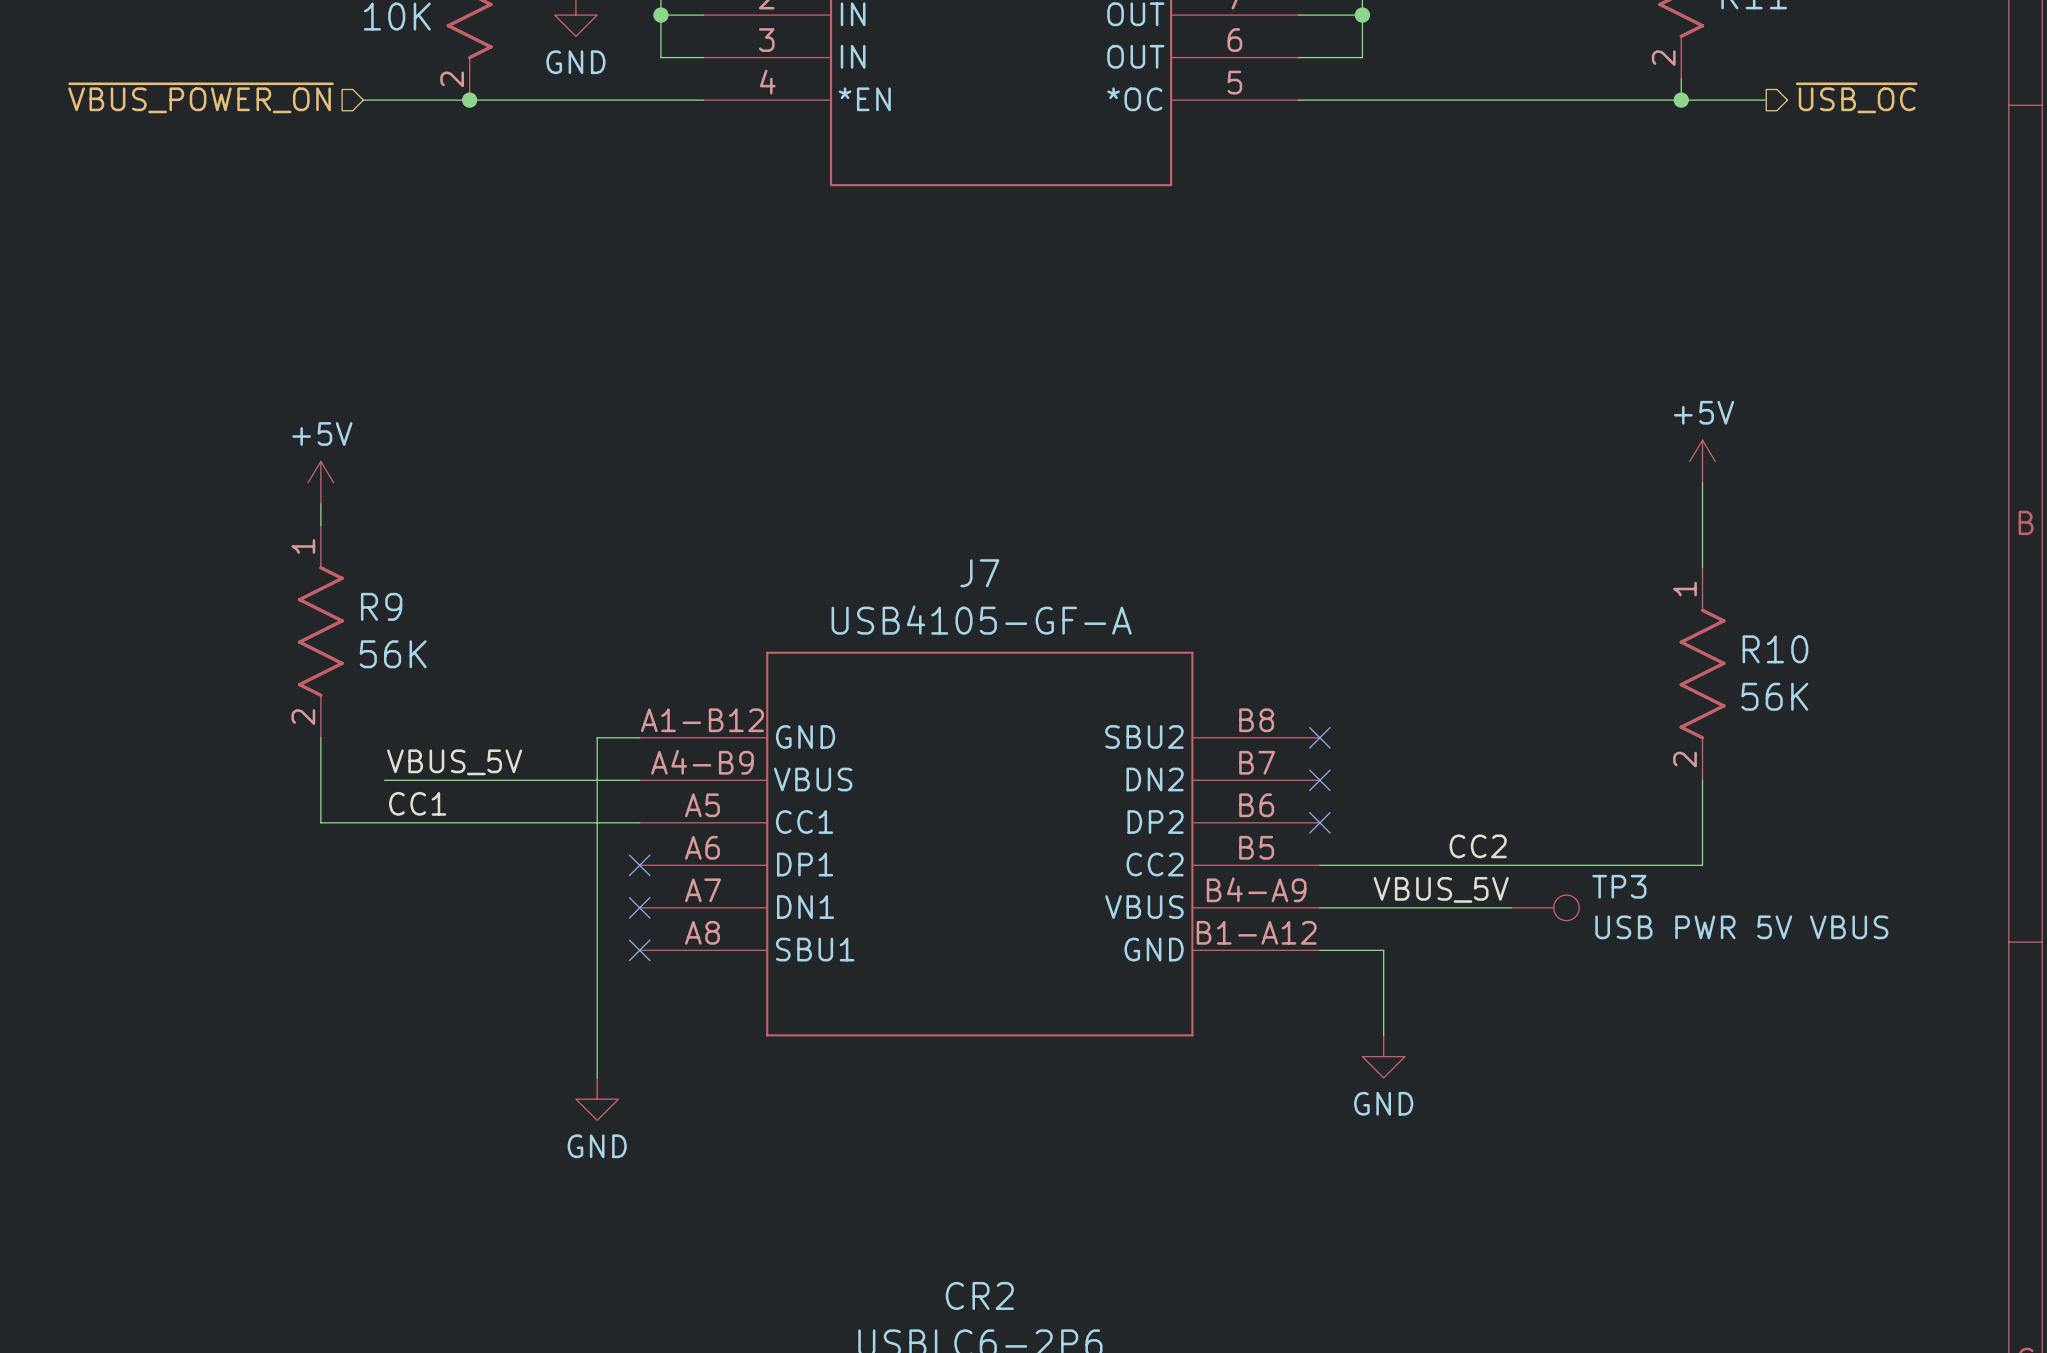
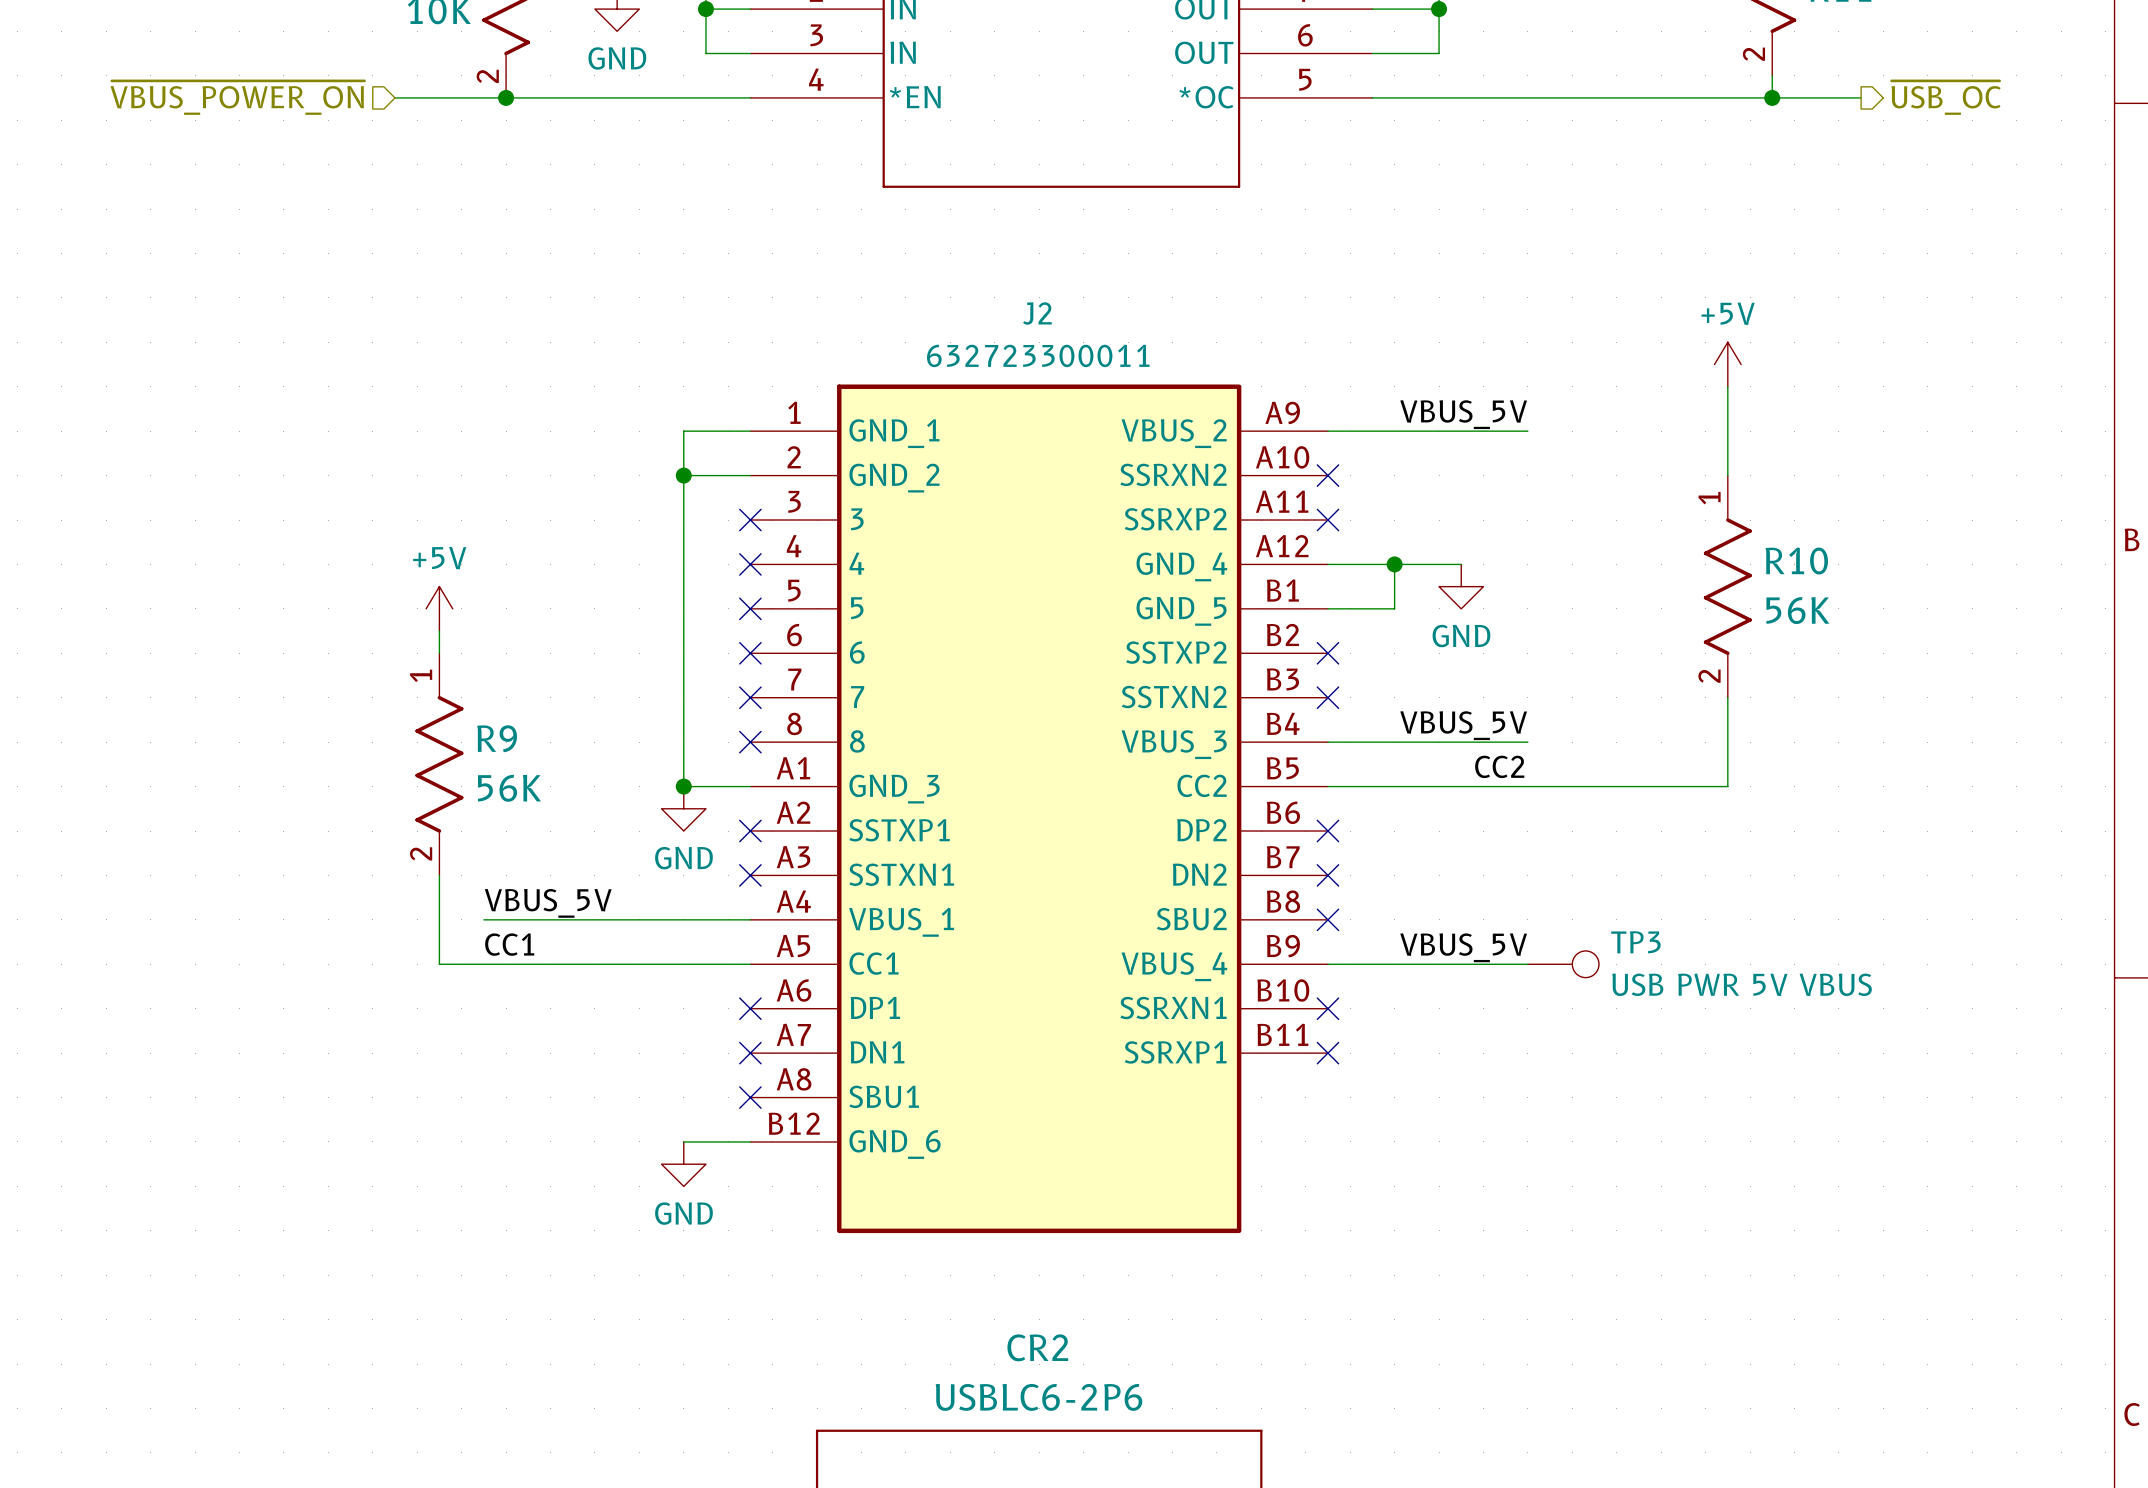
label: none -> VBUS_5V (1463, 414)
wire: none -> (750, 431) (683, 431) (683, 786) (750, 786)
wire: none -> (1327, 431) (1527, 431)
wire: none -> (683, 475) (750, 475)
junction: none -> (683, 475)
no-connect mark: none -> (1327, 475)
power symbol position: +5V (1702, 461) -> +5V (1727, 364)
power symbol position: +5V (320, 482) -> +5V (439, 608)
wire: (1702, 482) (1702, 567) -> (1727, 386) (1727, 475)
wire: (320, 503) (320, 525) -> (439, 631) (439, 653)
no-connect mark: none -> (750, 520)
no-connect mark: none -> (1327, 520)
no-connect mark: none -> (750, 564)
wire: none -> (1327, 564) (1461, 564)
wire: none -> (1394, 564) (1394, 608) (1327, 608)
junction: none -> (1394, 564)
power symbol: none -> GND (1461, 586)
no-connect mark: none -> (750, 608)
R9 position: (320, 631) -> (439, 764)
no-connect mark: none -> (750, 653)
no-connect mark: none -> (1327, 653)
no-connect mark: none -> (750, 697)
no-connect mark: none -> (1327, 697)
R10 position: (1702, 674) -> (1727, 586)
label: none -> VBUS_5V (1463, 725)
no-connect mark: none -> (750, 742)
wire: none -> (1327, 742) (1527, 742)
wire: (320, 737) (320, 822) (639, 822) -> none
wire: (639, 737) (597, 737) (597, 1077) -> none
no-connect mark: (1319, 737) -> none
junction: none -> (683, 786)
label position: VBUS_5V (454, 762) -> VBUS_5V (548, 903)
wire: (384, 780) (639, 780) -> (483, 919) (750, 919)
power symbol: none -> GND (683, 808)
J2: none -> 632723300011 (1039, 808)
no-connect mark: (1319, 780) -> none
wire: (1702, 780) (1702, 865) (1319, 865) -> (1727, 697) (1727, 786) (1327, 786)
no-connect mark: none -> (750, 831)
no-connect mark: none -> (1327, 831)
label position: CC1 (417, 803) -> CC1 (509, 944)
no-connect mark: (1319, 822) -> none
wire: none -> (439, 875) (439, 964) (750, 964)
no-connect mark: none -> (750, 875)
J7: USB4105-GF-A (979, 844) -> none
no-connect mark: none -> (1327, 875)
label position: CC2 (1478, 846) -> CC2 (1499, 766)
no-connect mark: (639, 865) -> none
no-connect mark: none -> (1327, 919)
label position: VBUS_5V (1441, 889) -> VBUS_5V (1463, 947)
no-connect mark: (639, 907) -> none
wire: (1319, 907) (1511, 907) -> (1327, 964) (1527, 964)
TP3 position: (1545, 907) -> (1563, 964)
no-connect mark: (639, 950) -> none
wire: (1319, 950) (1383, 950) (1383, 1035) -> none
no-connect mark: none -> (750, 1008)
no-connect mark: none -> (1327, 1008)
no-connect mark: none -> (750, 1053)
no-connect mark: none -> (1327, 1053)
no-connect mark: none -> (750, 1097)
power symbol: GND (1383, 1056) -> none
power symbol position: GND (597, 1099) -> GND (683, 1164)
wire: none -> (683, 1141) (750, 1141)

